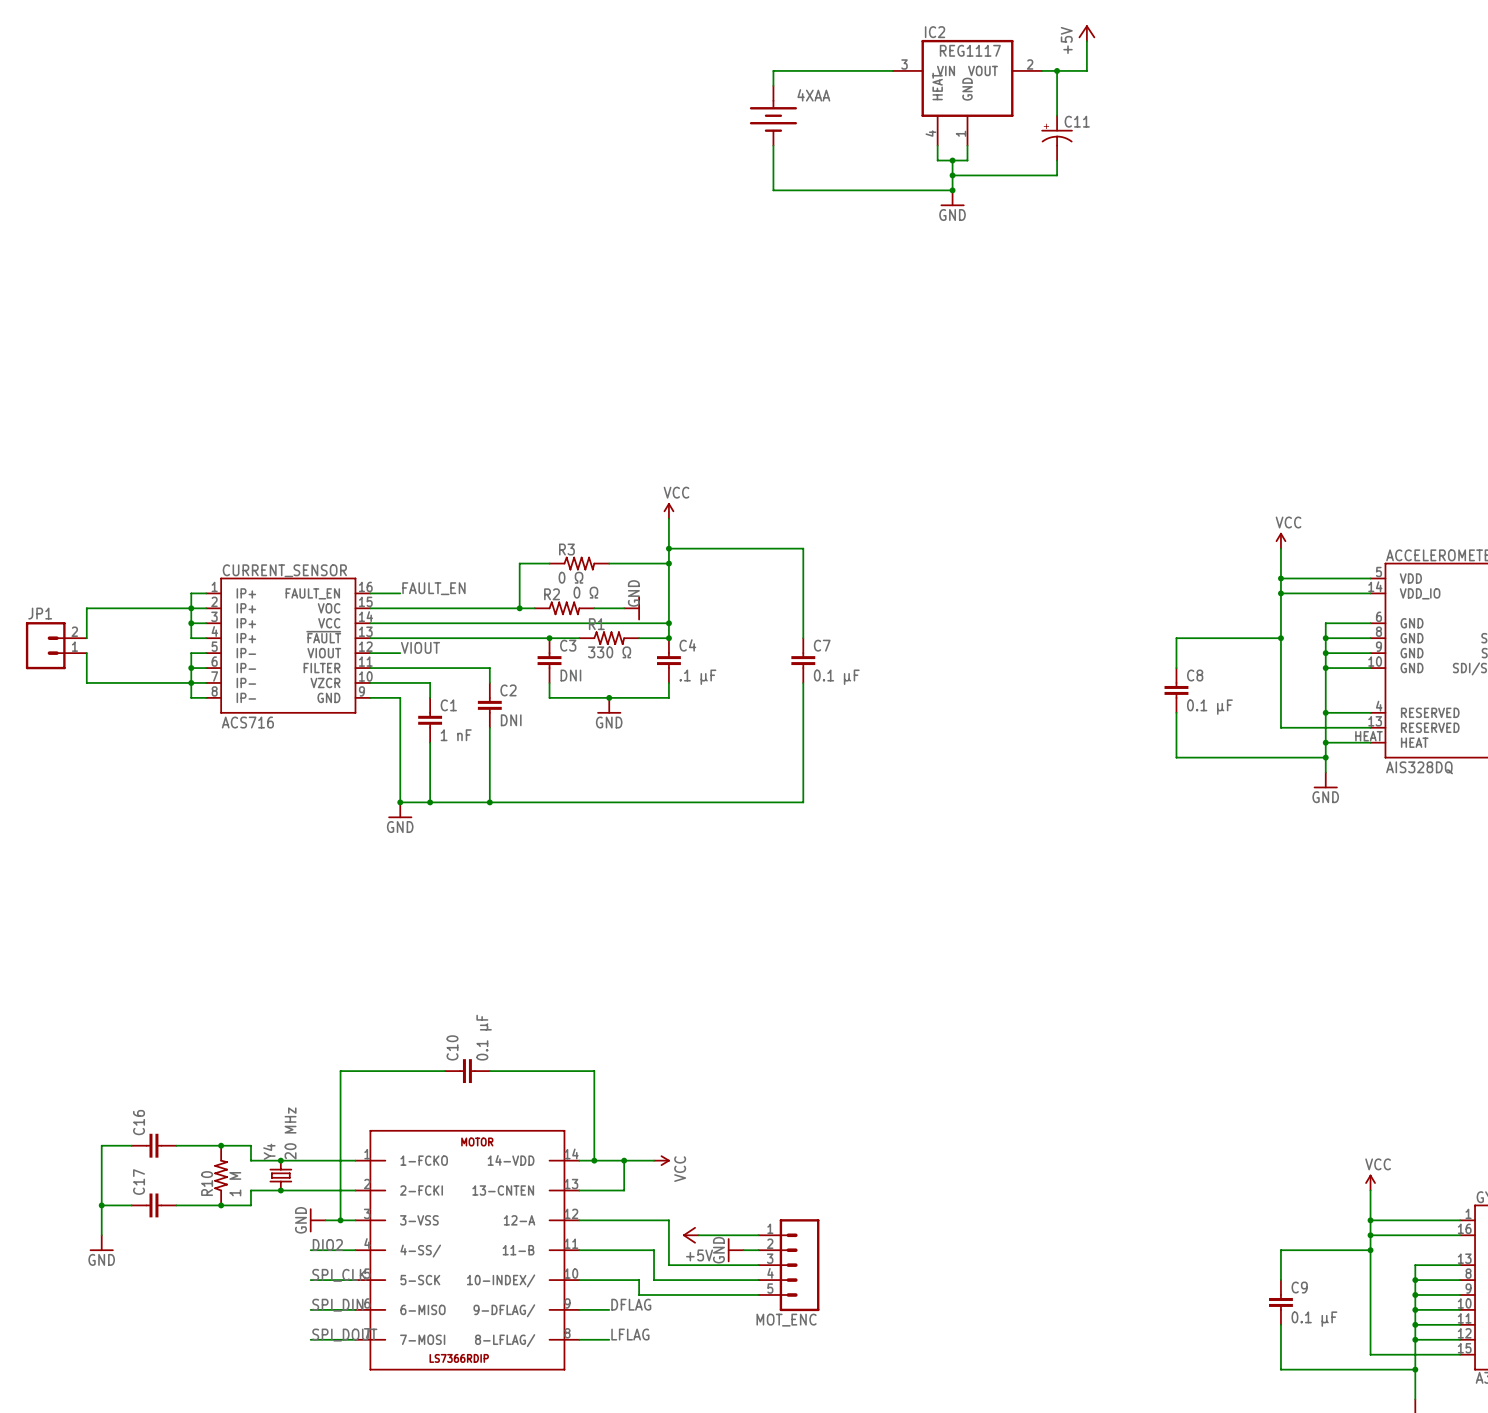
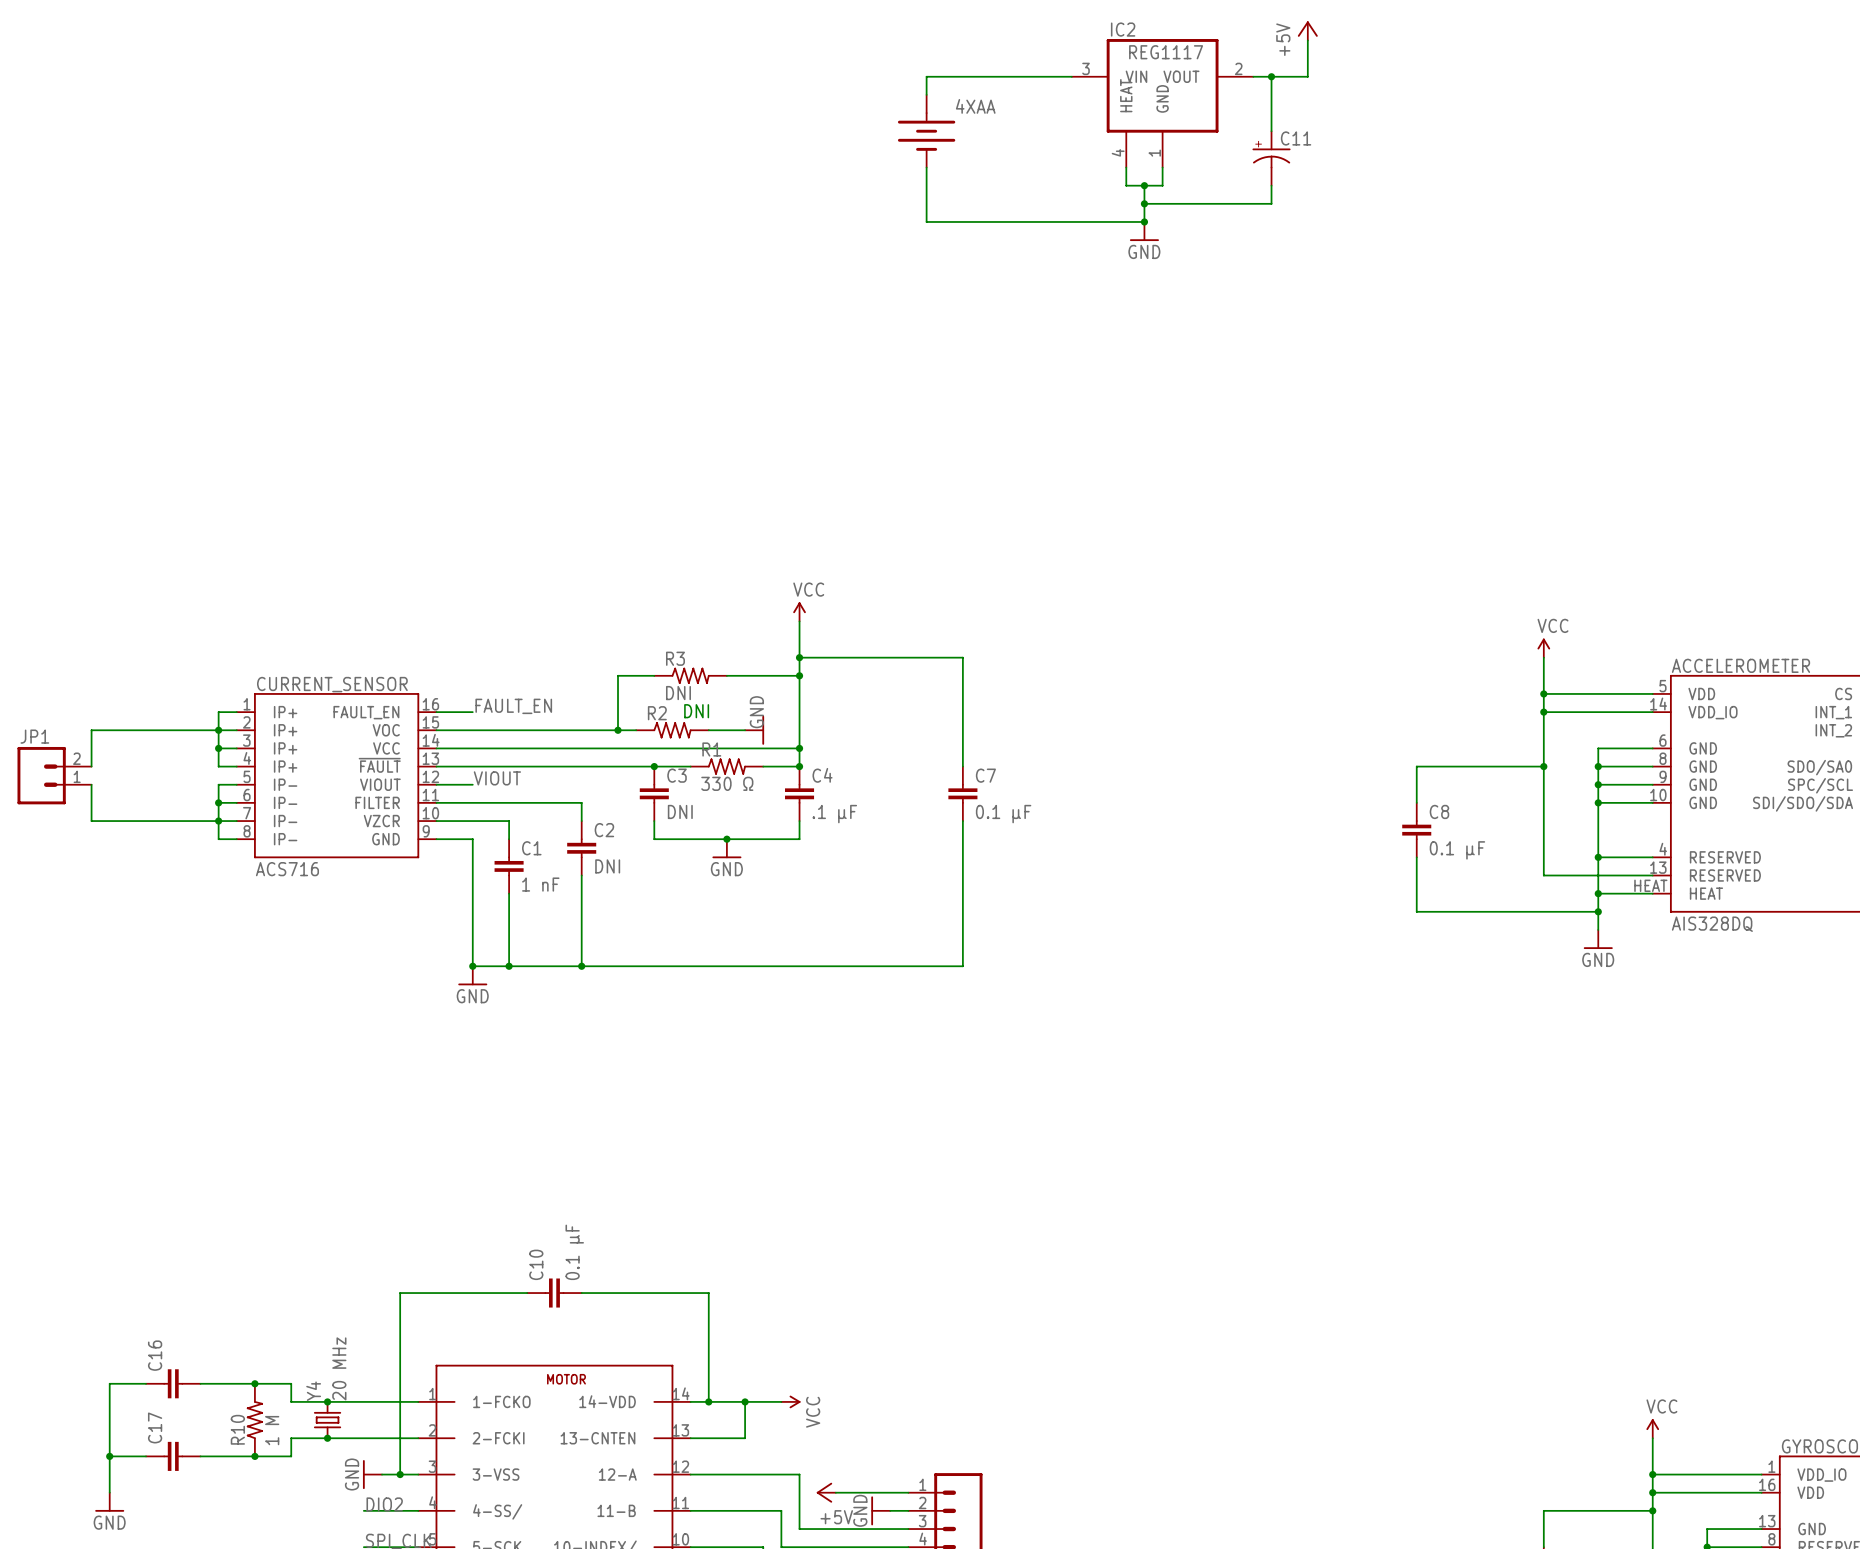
R3 value: 0 Ω (570, 577) -> DNI (678, 693)
R2 value: 0 Ω (585, 592) -> DNI (696, 711)

